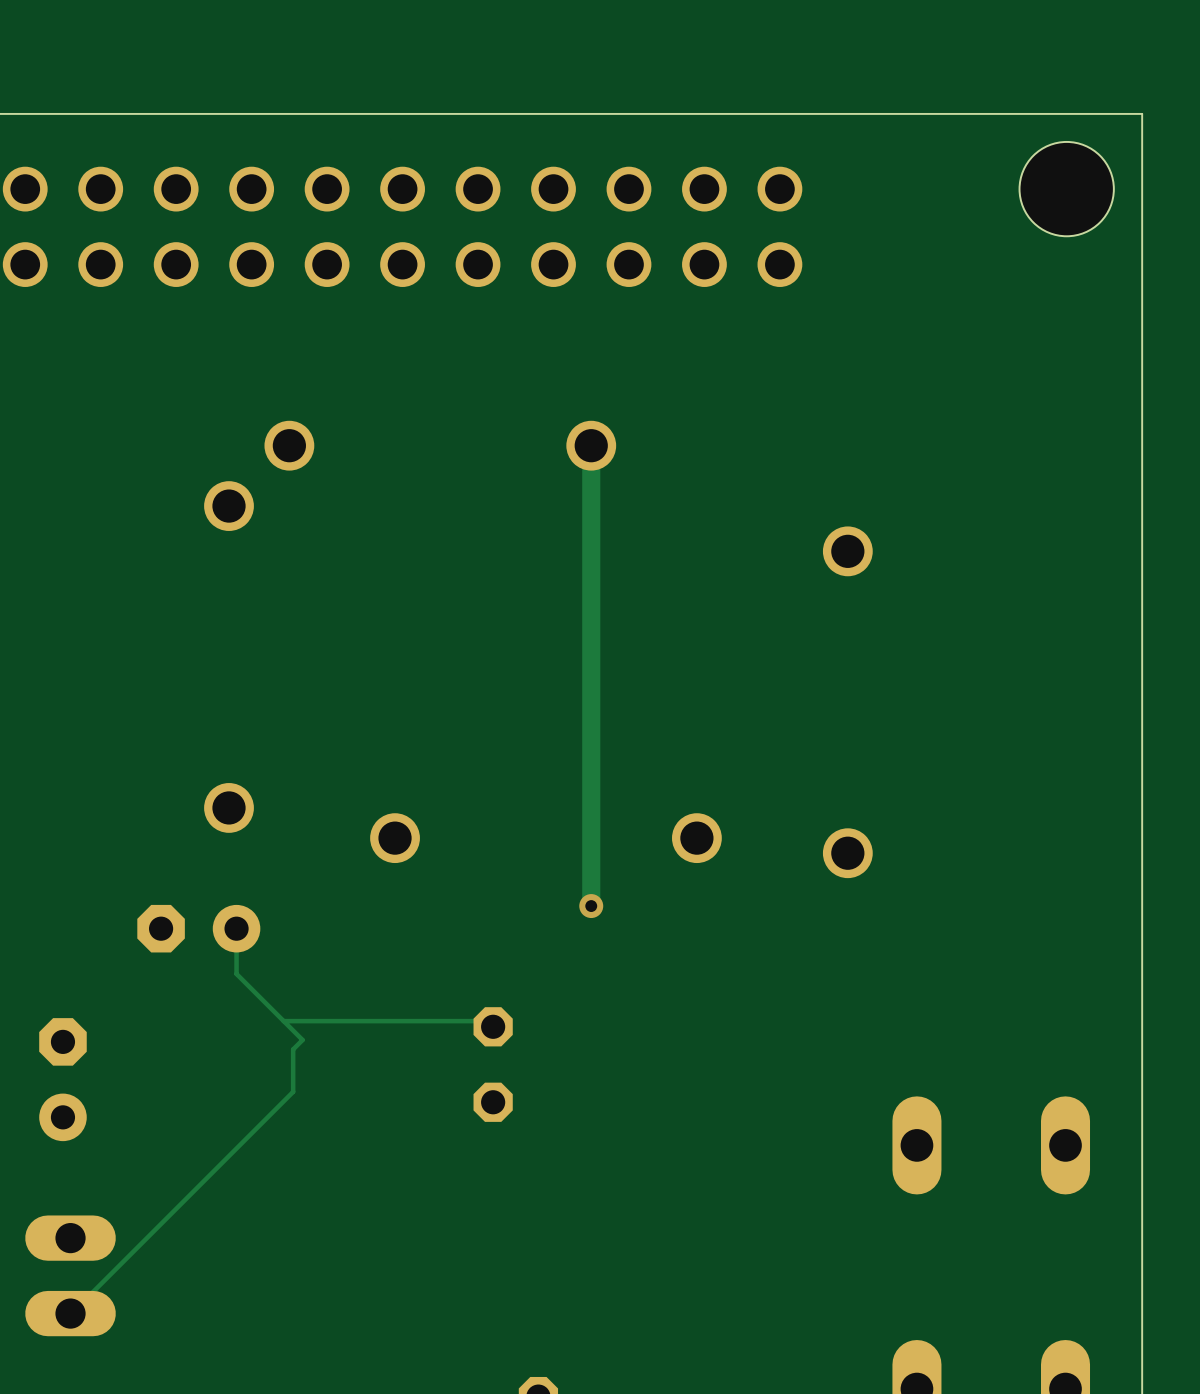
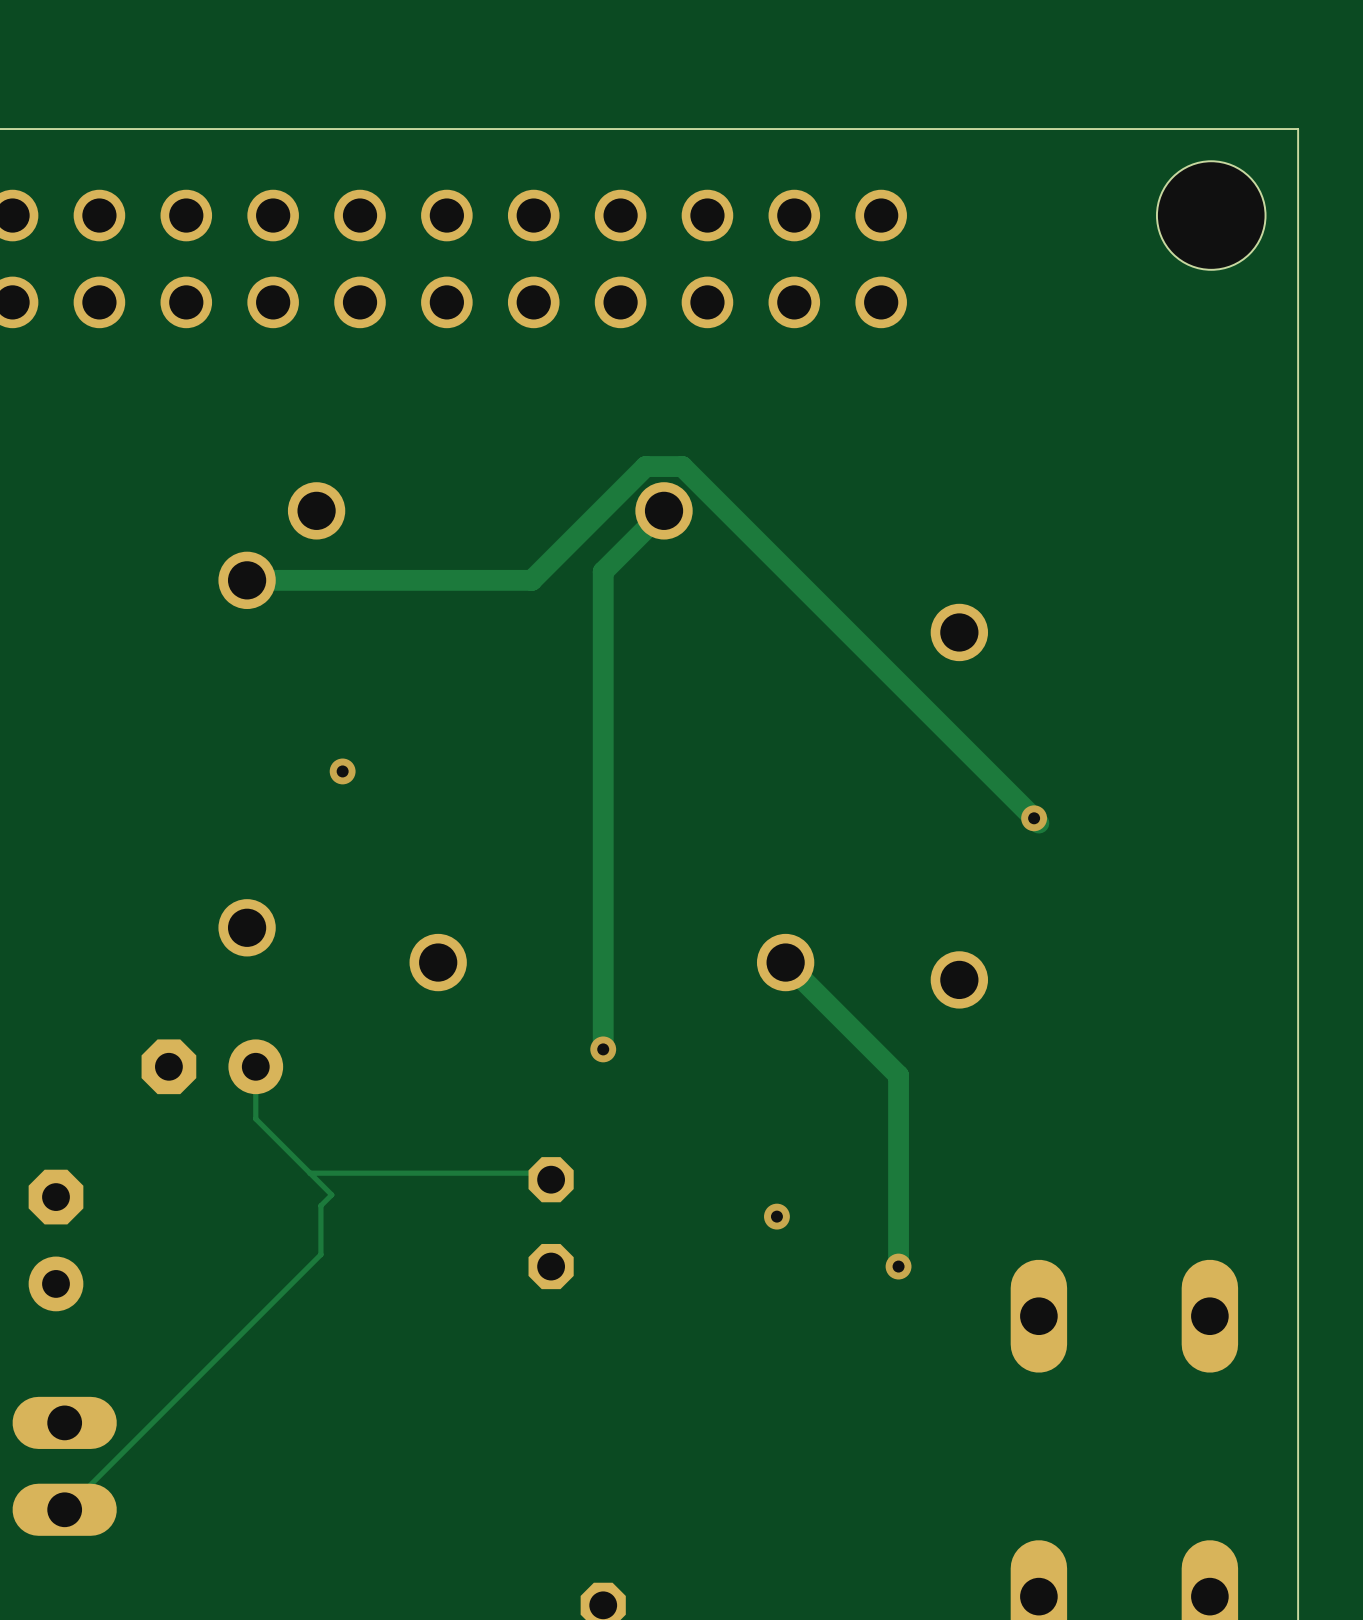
track: (591, 445) (591, 906) -> (664, 510) (603, 571) (603, 1049)
track: none -> (247, 580) (531, 580) (645, 466) (682, 466) (1038, 823)
via: none -> (342, 771)
via: none -> (1034, 818)
track: none -> (785, 962) (898, 1075) (898, 1266)
via: (591, 906) -> none
via: none -> (603, 1049)
via: none -> (776, 1216)
via: none -> (898, 1266)

